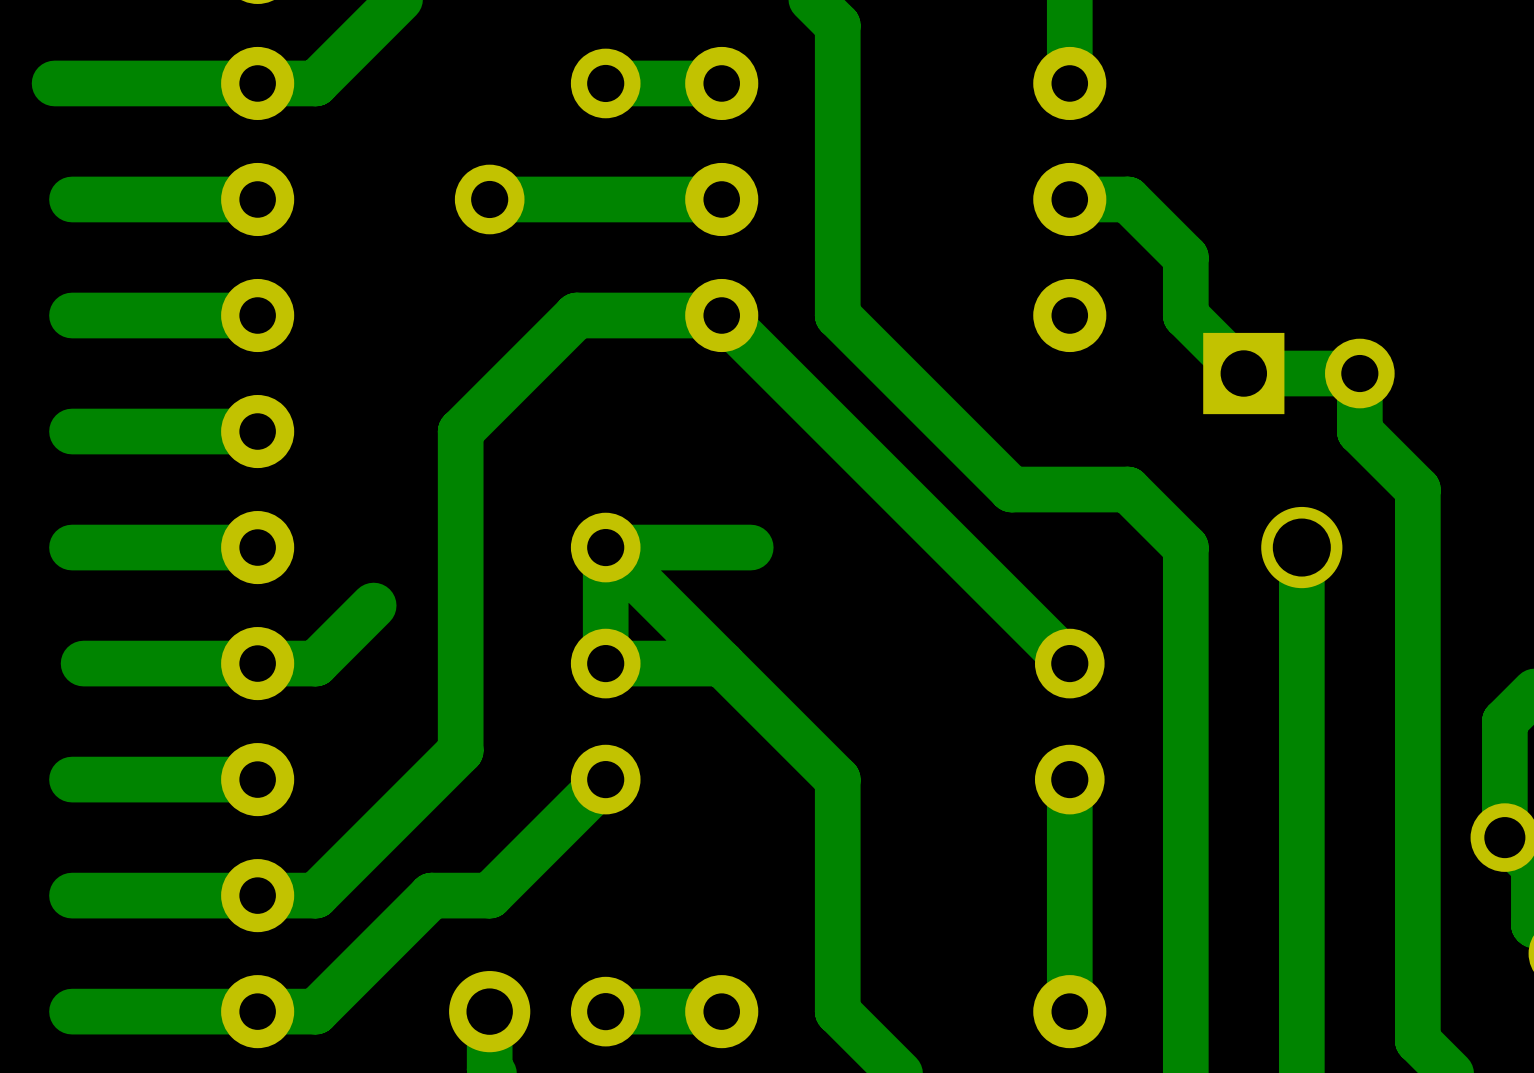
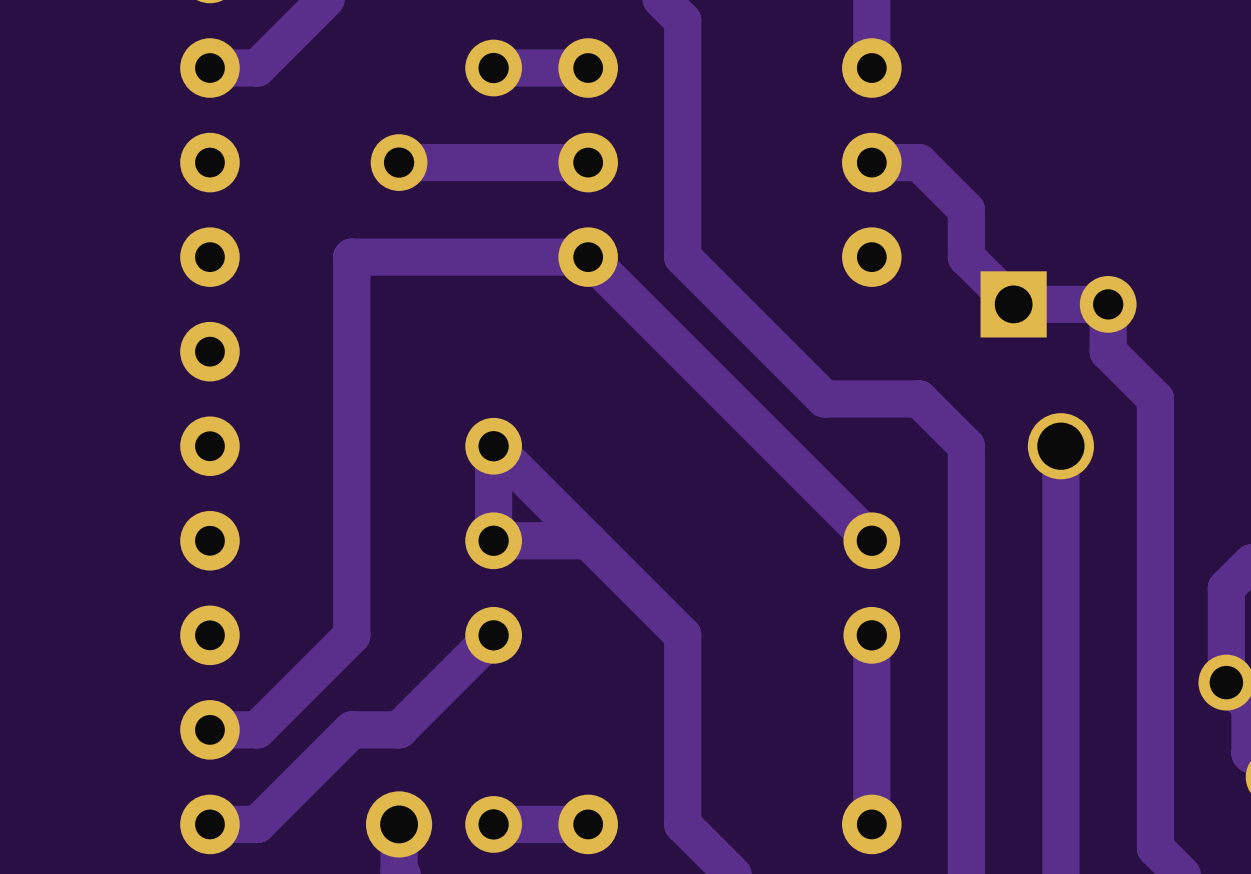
track: (257, 83) (54, 83) -> none
track: (257, 199) (72, 199) -> none
track: (257, 315) (72, 315) -> none
track: (576, 315) (460, 431) (460, 750) (431, 779) -> (469, 257) (351, 257) (351, 635)
track: (257, 431) (72, 431) -> none
track: (257, 547) (72, 547) -> none
track: (750, 547) (605, 547) -> none
track: (373, 605) (315, 663) (83, 663) -> none
track: (257, 779) (72, 779) -> none
track: (257, 895) (72, 895) -> none
track: (257, 1011) (72, 1011) -> none

